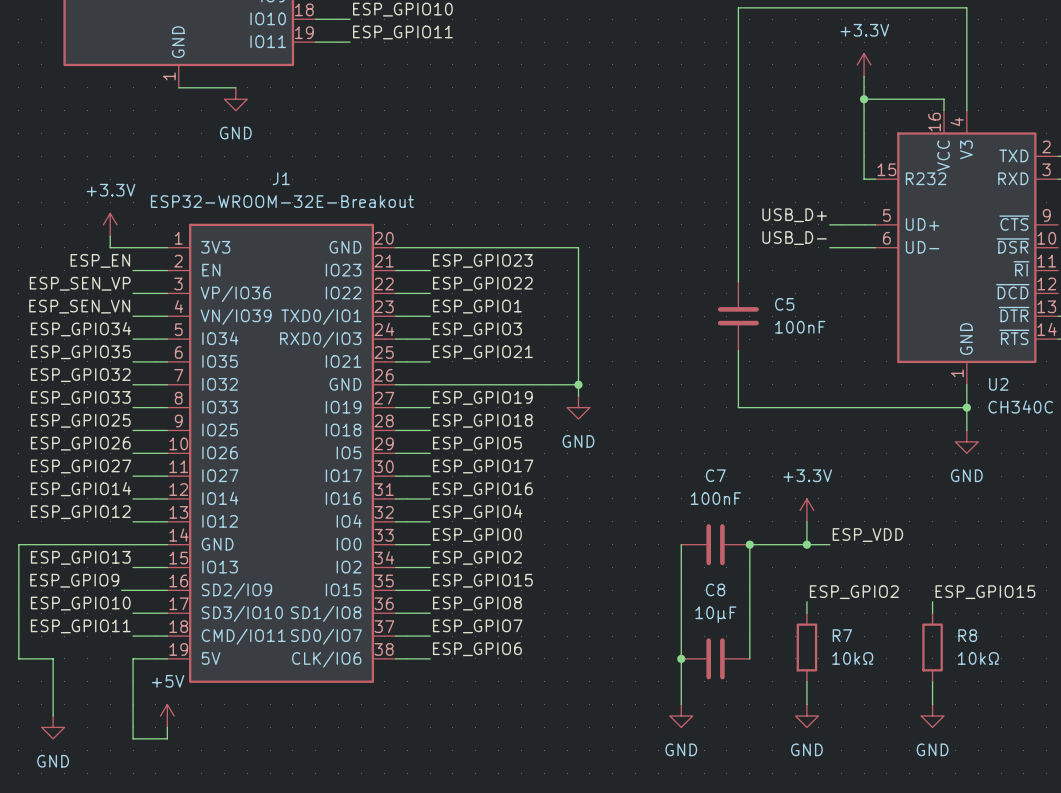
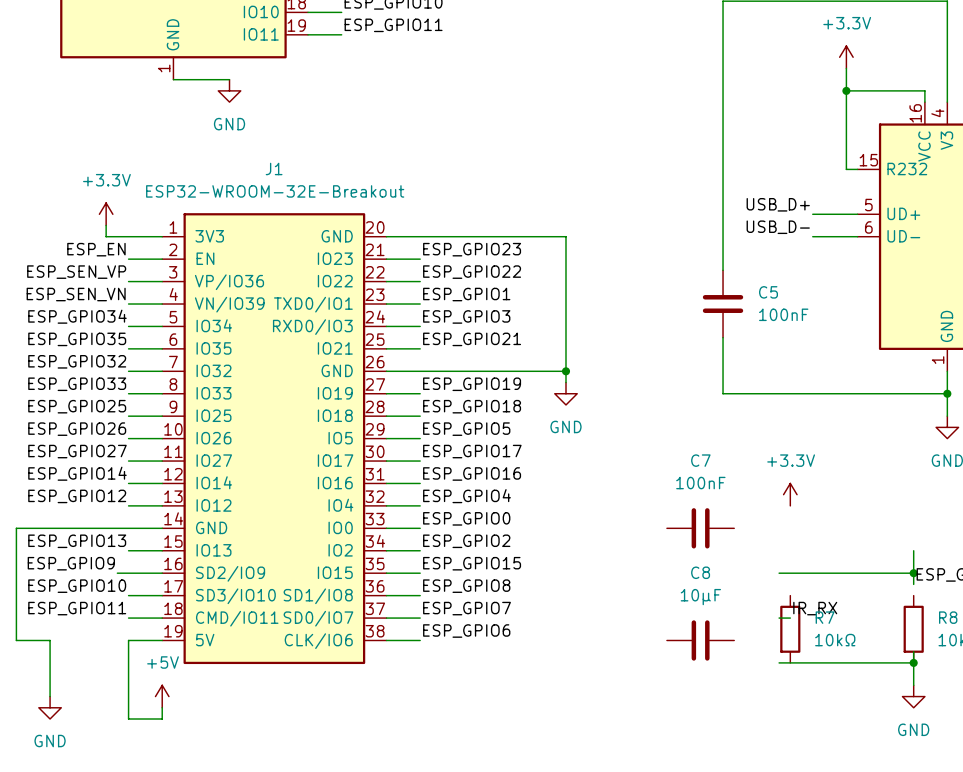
wire: (806, 521) (806, 544) -> none
label: ESP_VDD (867, 535) -> none
wire: (681, 544) (681, 704) -> none
junction: (749, 544) -> none
junction: (806, 544) -> none
wire: (829, 544) (749, 544) (749, 658) -> none
wire: none -> (779, 573) (913, 573)
junction: none -> (913, 573)
label: ESP_GPIO2 (854, 592) -> none
wire: (806, 601) (806, 613) -> none
wire: (932, 601) (932, 613) -> (913, 584) (913, 550)
label: none -> IR_RX (815, 608)
wire: none -> (779, 618) (790, 618)
junction: (681, 658) -> none
wire: none -> (913, 651) (913, 662) (779, 662)
wire: (806, 681) (806, 704) -> none
junction: none -> (913, 662)
power symbol: GND (681, 716) -> none
power symbol: GND (806, 716) -> none

